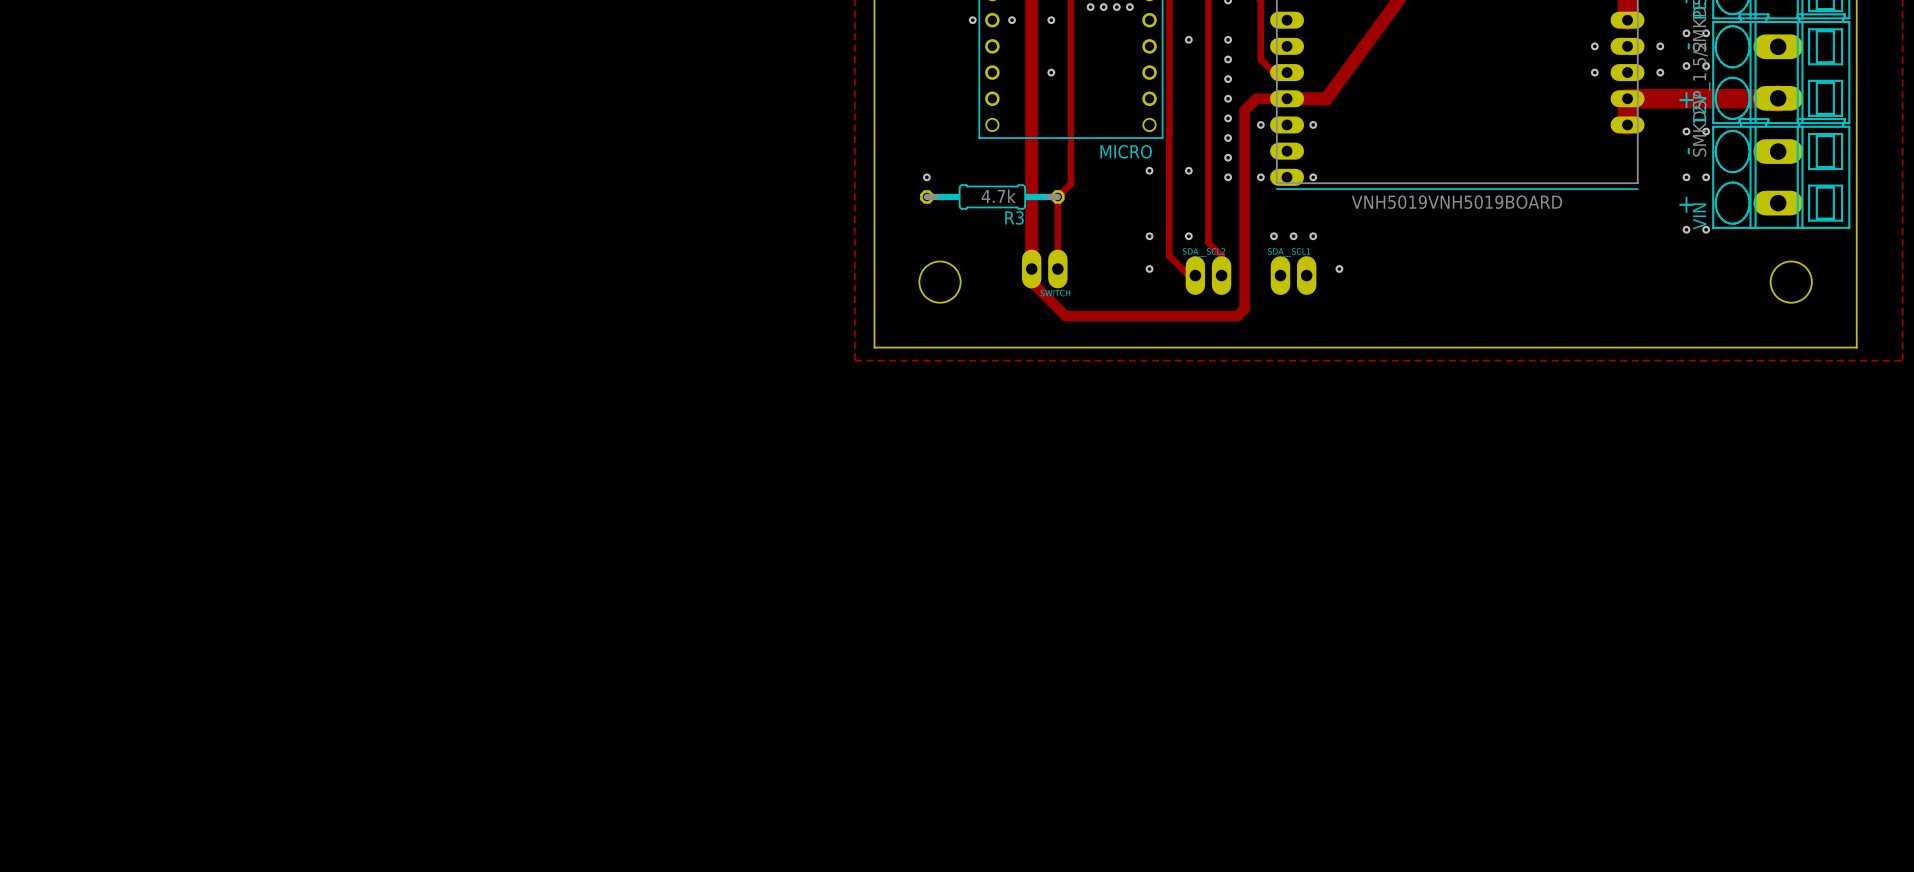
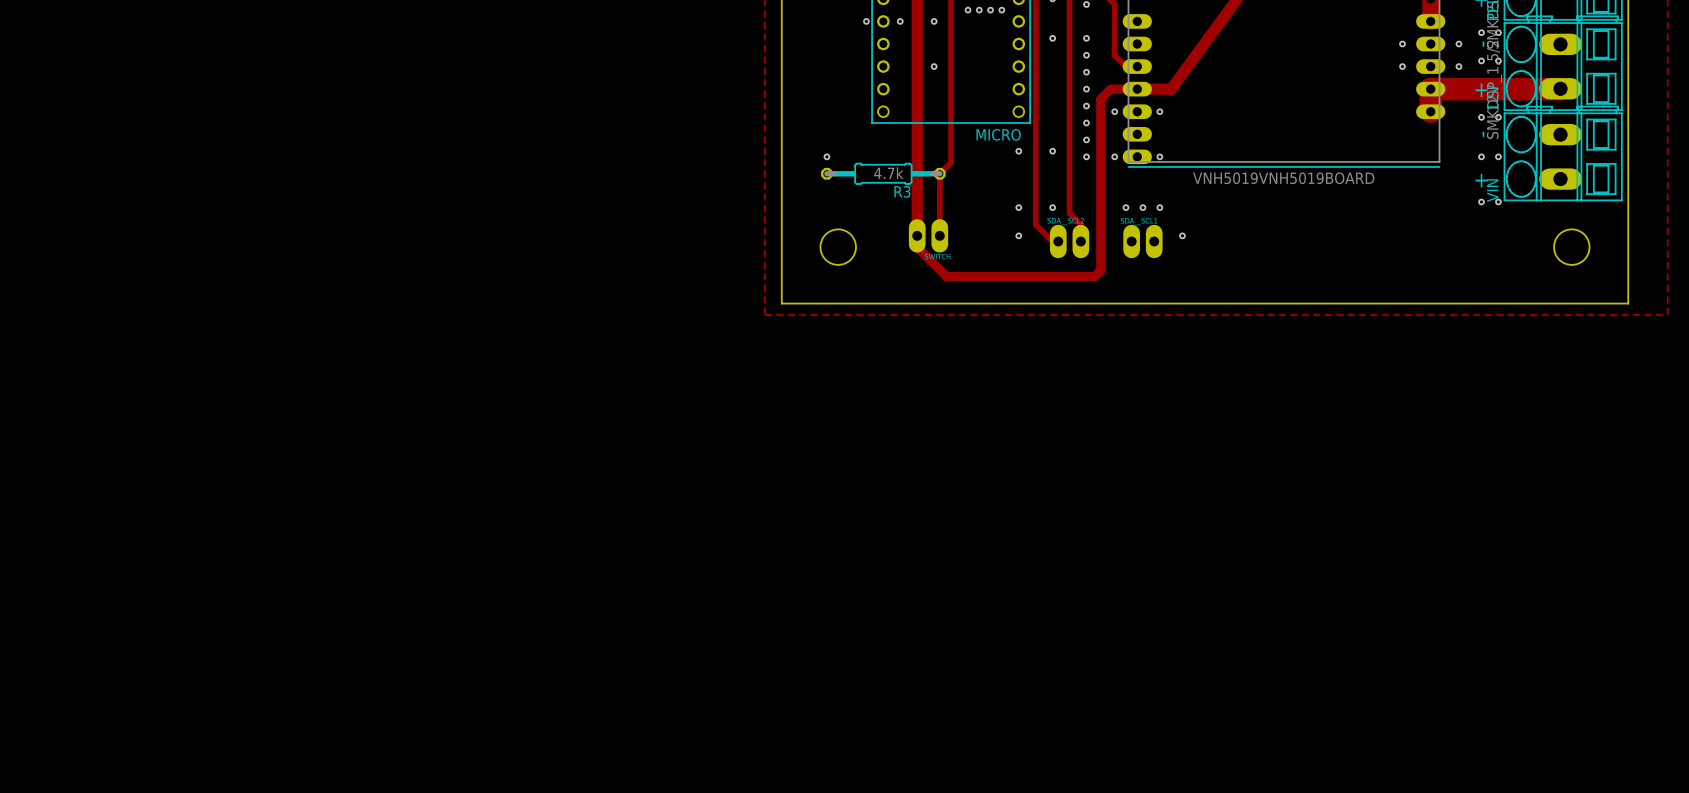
track width: thin (1777, 98) (1627, 98) (1627, 124) -> thick (1560, 89) (1430, 89) (1430, 111)

